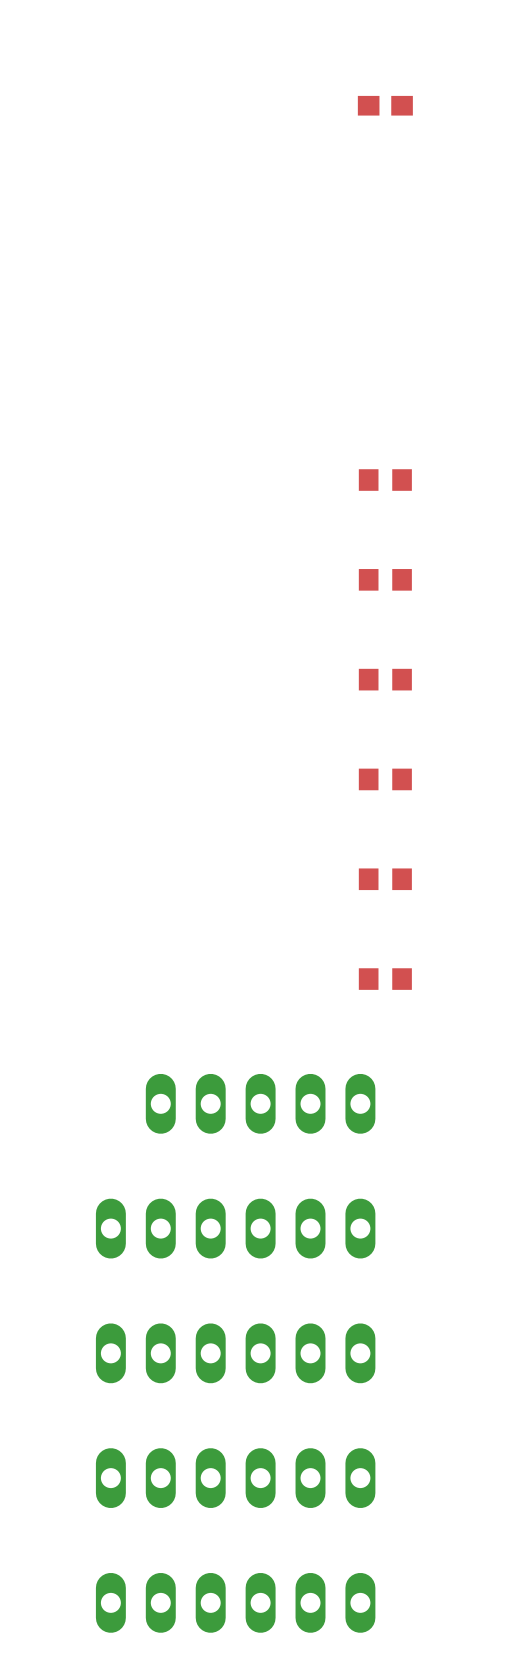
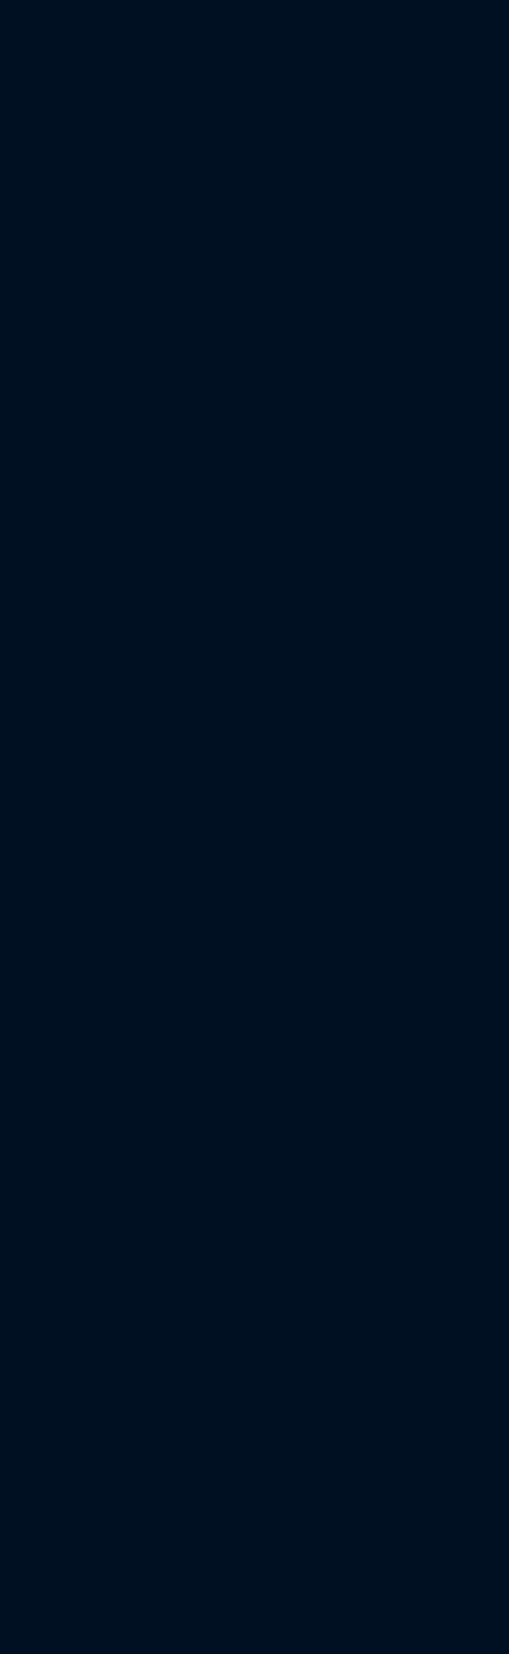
part: (385, 105) -> none
part: (385, 480) -> none
part: (385, 579) -> none
part: (385, 679) -> none
part: (385, 779) -> none
part: (385, 879) -> none
part: (385, 979) -> none
part: (260, 1103) -> none
part: (235, 1228) -> none
part: (235, 1353) -> none
part: (235, 1478) -> none
part: (235, 1602) -> none

